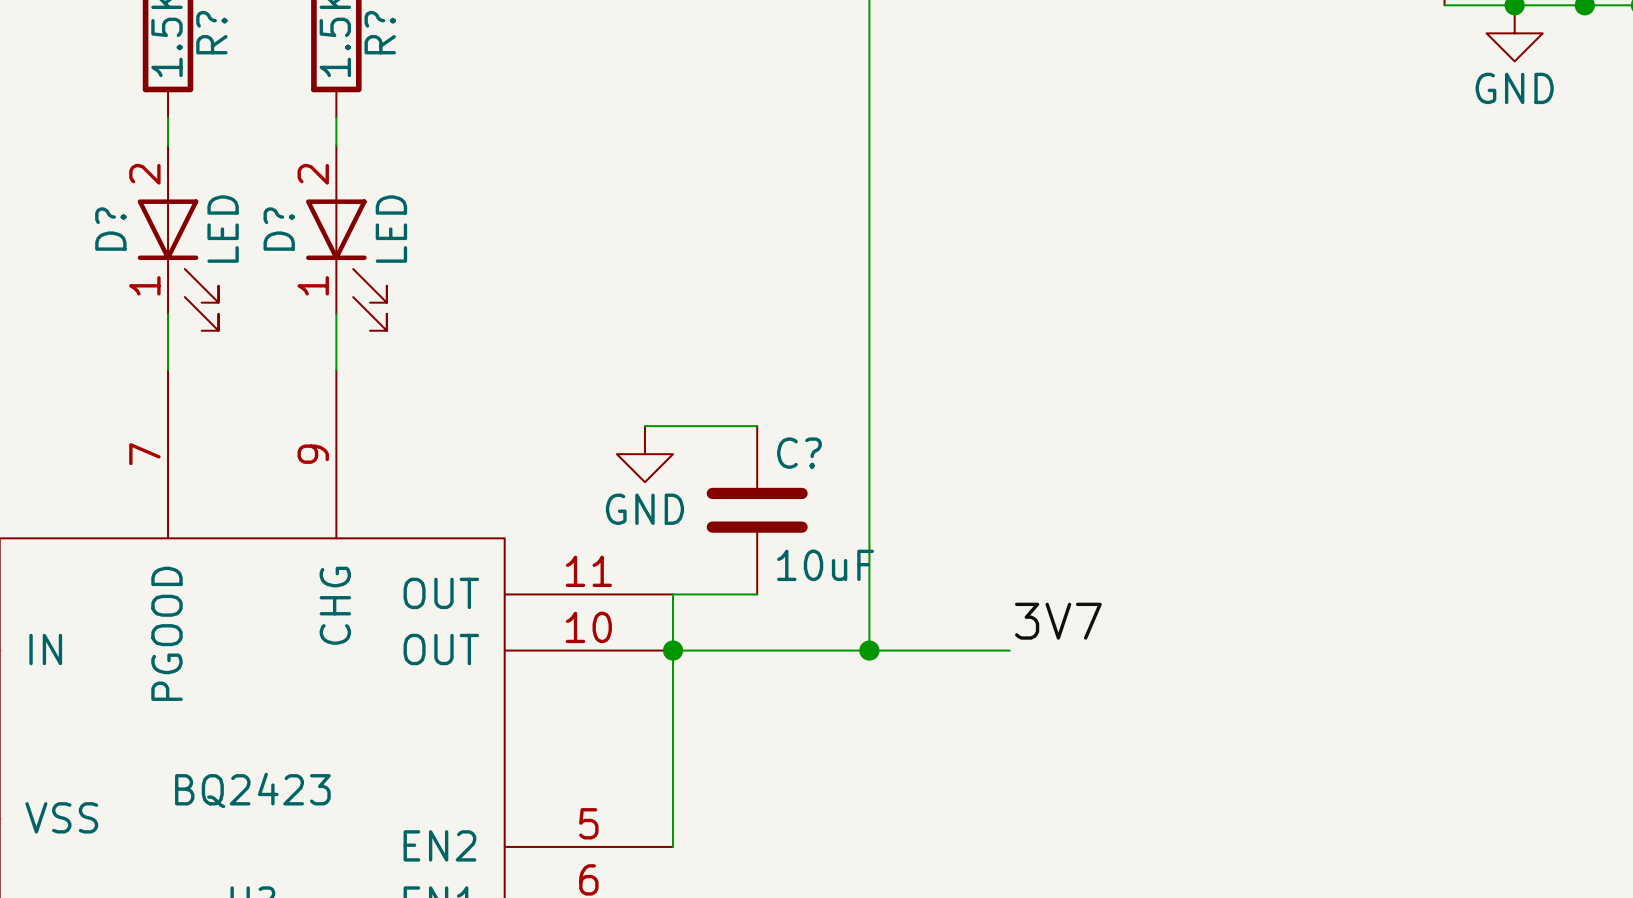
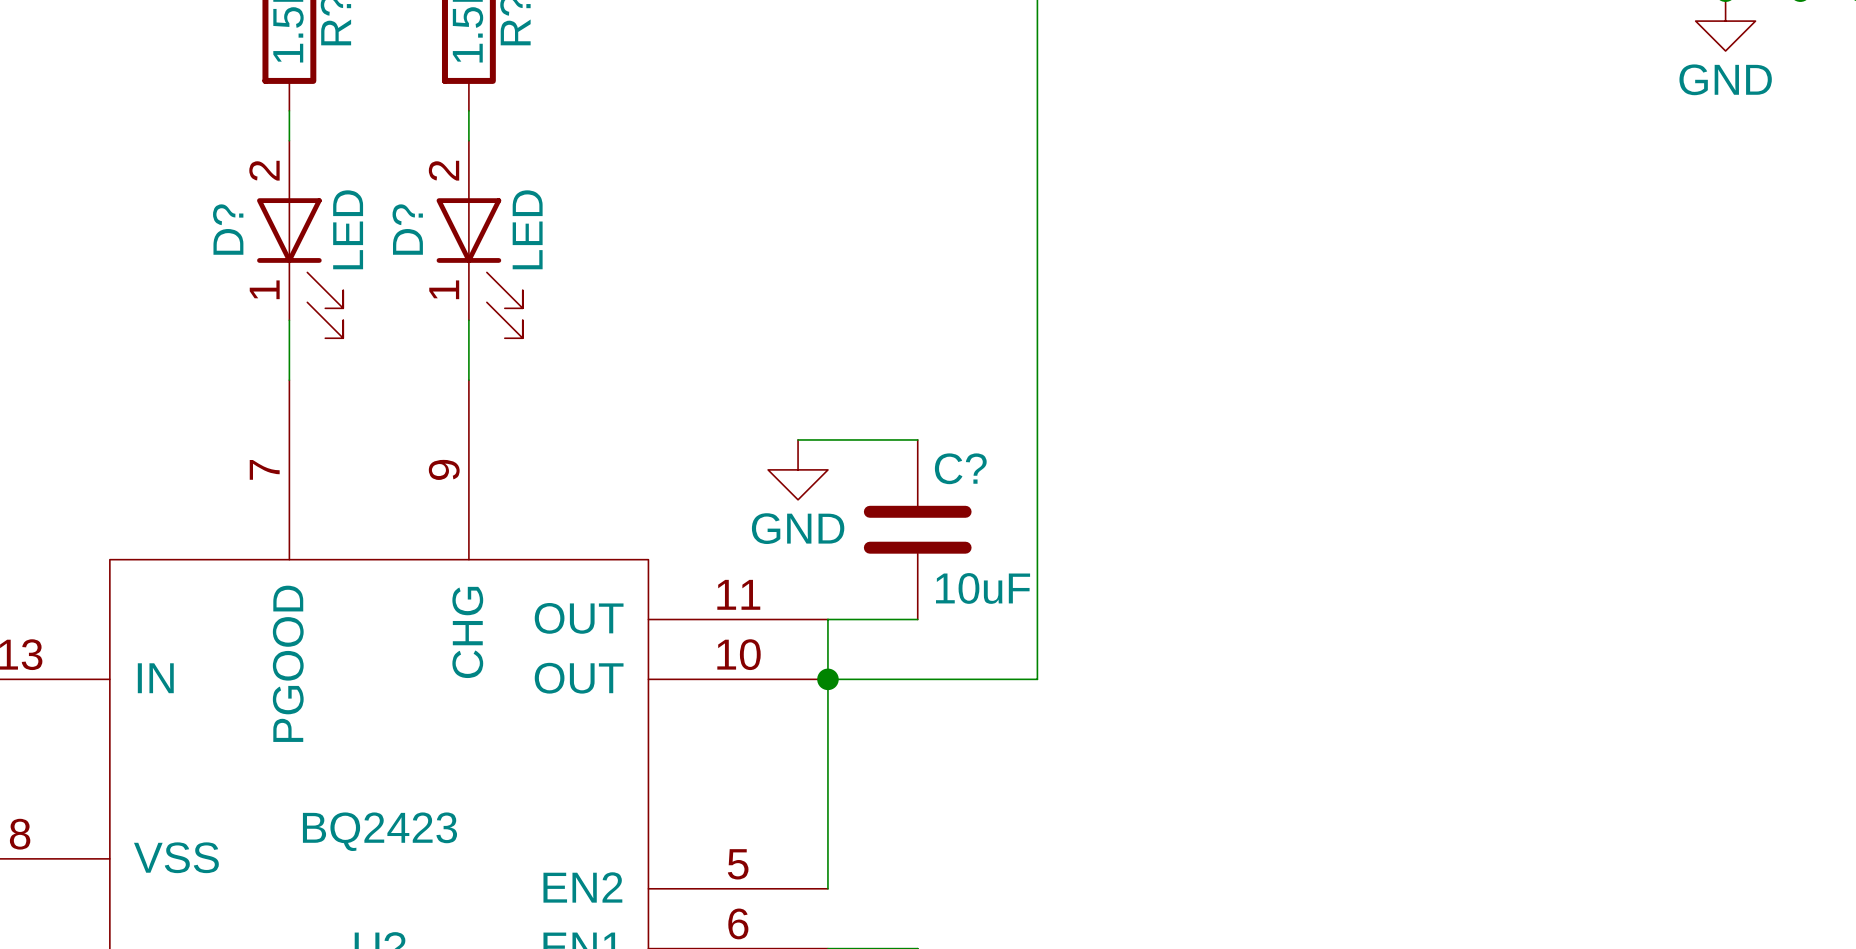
label: 3V7 (1058, 621) -> none
wire: (869, 650) (1009, 650) -> none
junction: (869, 650) -> none

